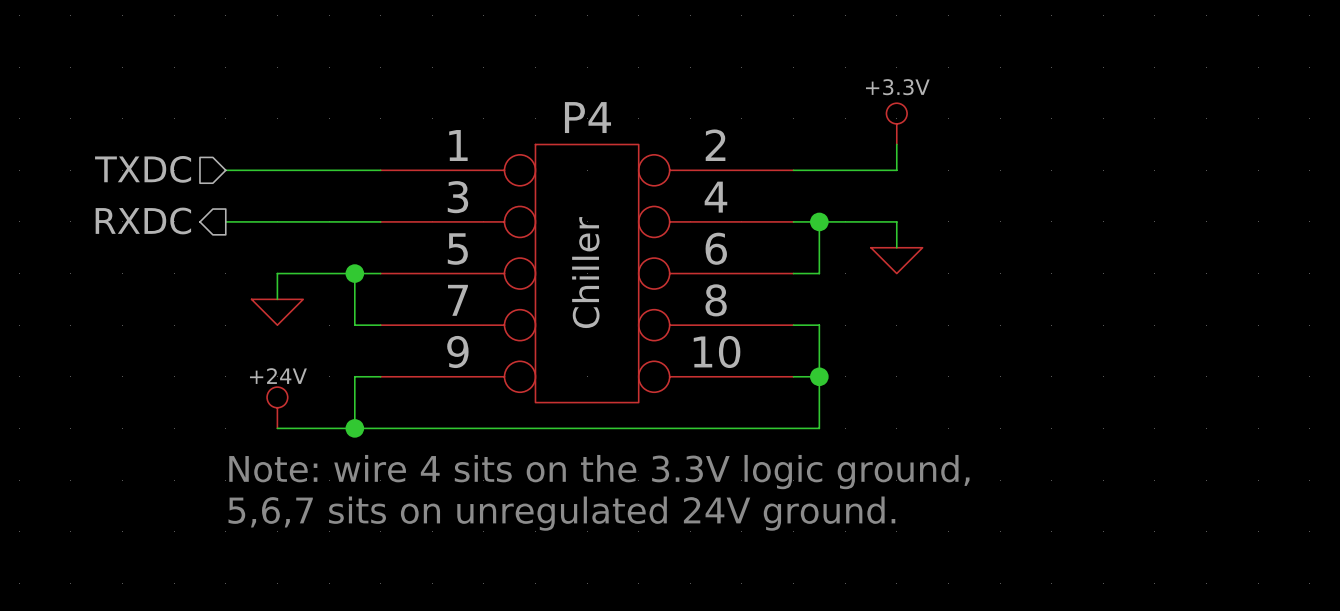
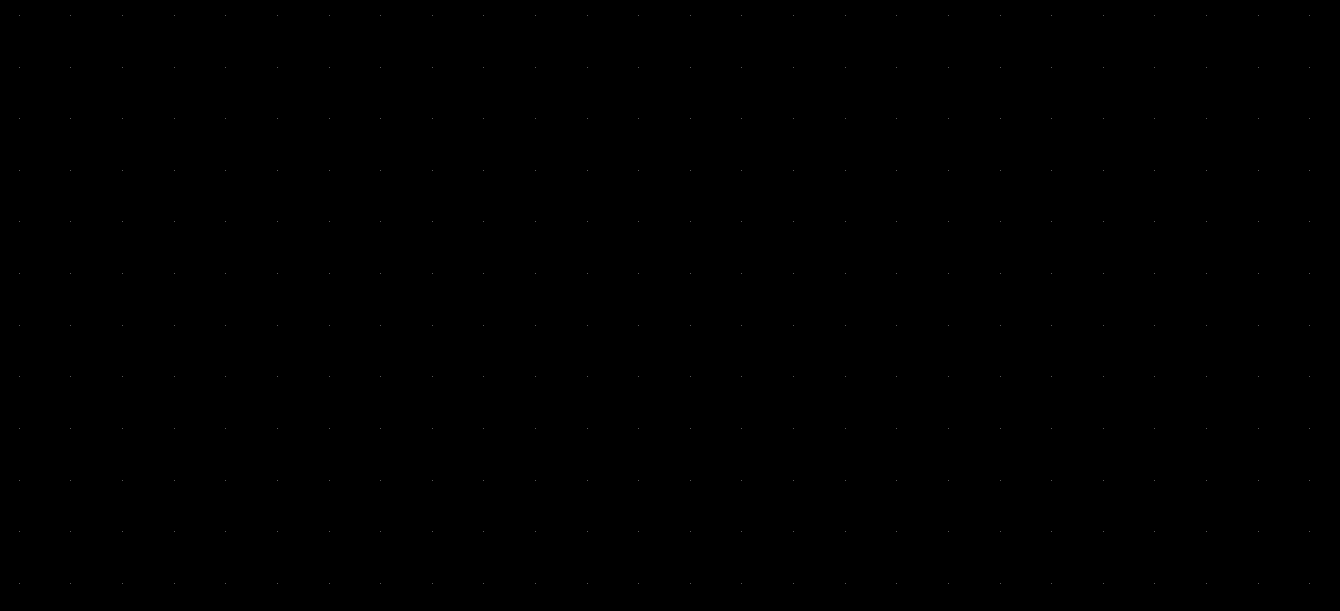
power symbol: +3.3V (896, 123) -> none
wire: (896, 144) (896, 170) (793, 170) -> none
hierarchical label: TXDC (143, 169) -> none
wire: (225, 170) (380, 170) -> none
hierarchical label: RXDC (143, 220) -> none
wire: (225, 221) (380, 221) -> none
wire: (793, 221) (896, 221) (896, 247) -> none
wire: (819, 221) (819, 273) (793, 273) -> none
junction: (819, 221) -> none
power symbol: (896, 260) -> none
wire: (354, 273) (354, 325) (380, 325) -> none
junction: (354, 273) -> none
wire: (380, 273) (277, 273) (277, 299) -> none
P4: Chiller (587, 273) -> none
power symbol: (277, 312) -> none
wire: (793, 325) (819, 325) (819, 428) (277, 428) -> none
wire: (380, 376) (354, 376) (354, 428) -> none
wire: (793, 376) (819, 376) -> none
junction: (819, 376) -> none
power symbol: +24V (277, 407) -> none
junction: (354, 428) -> none
text: Note: wire 4 sits on the 3.3V logic ground, (599, 472) -> none
text: 5,6,7 sits on unregulated 24V ground. (561, 513) -> none

